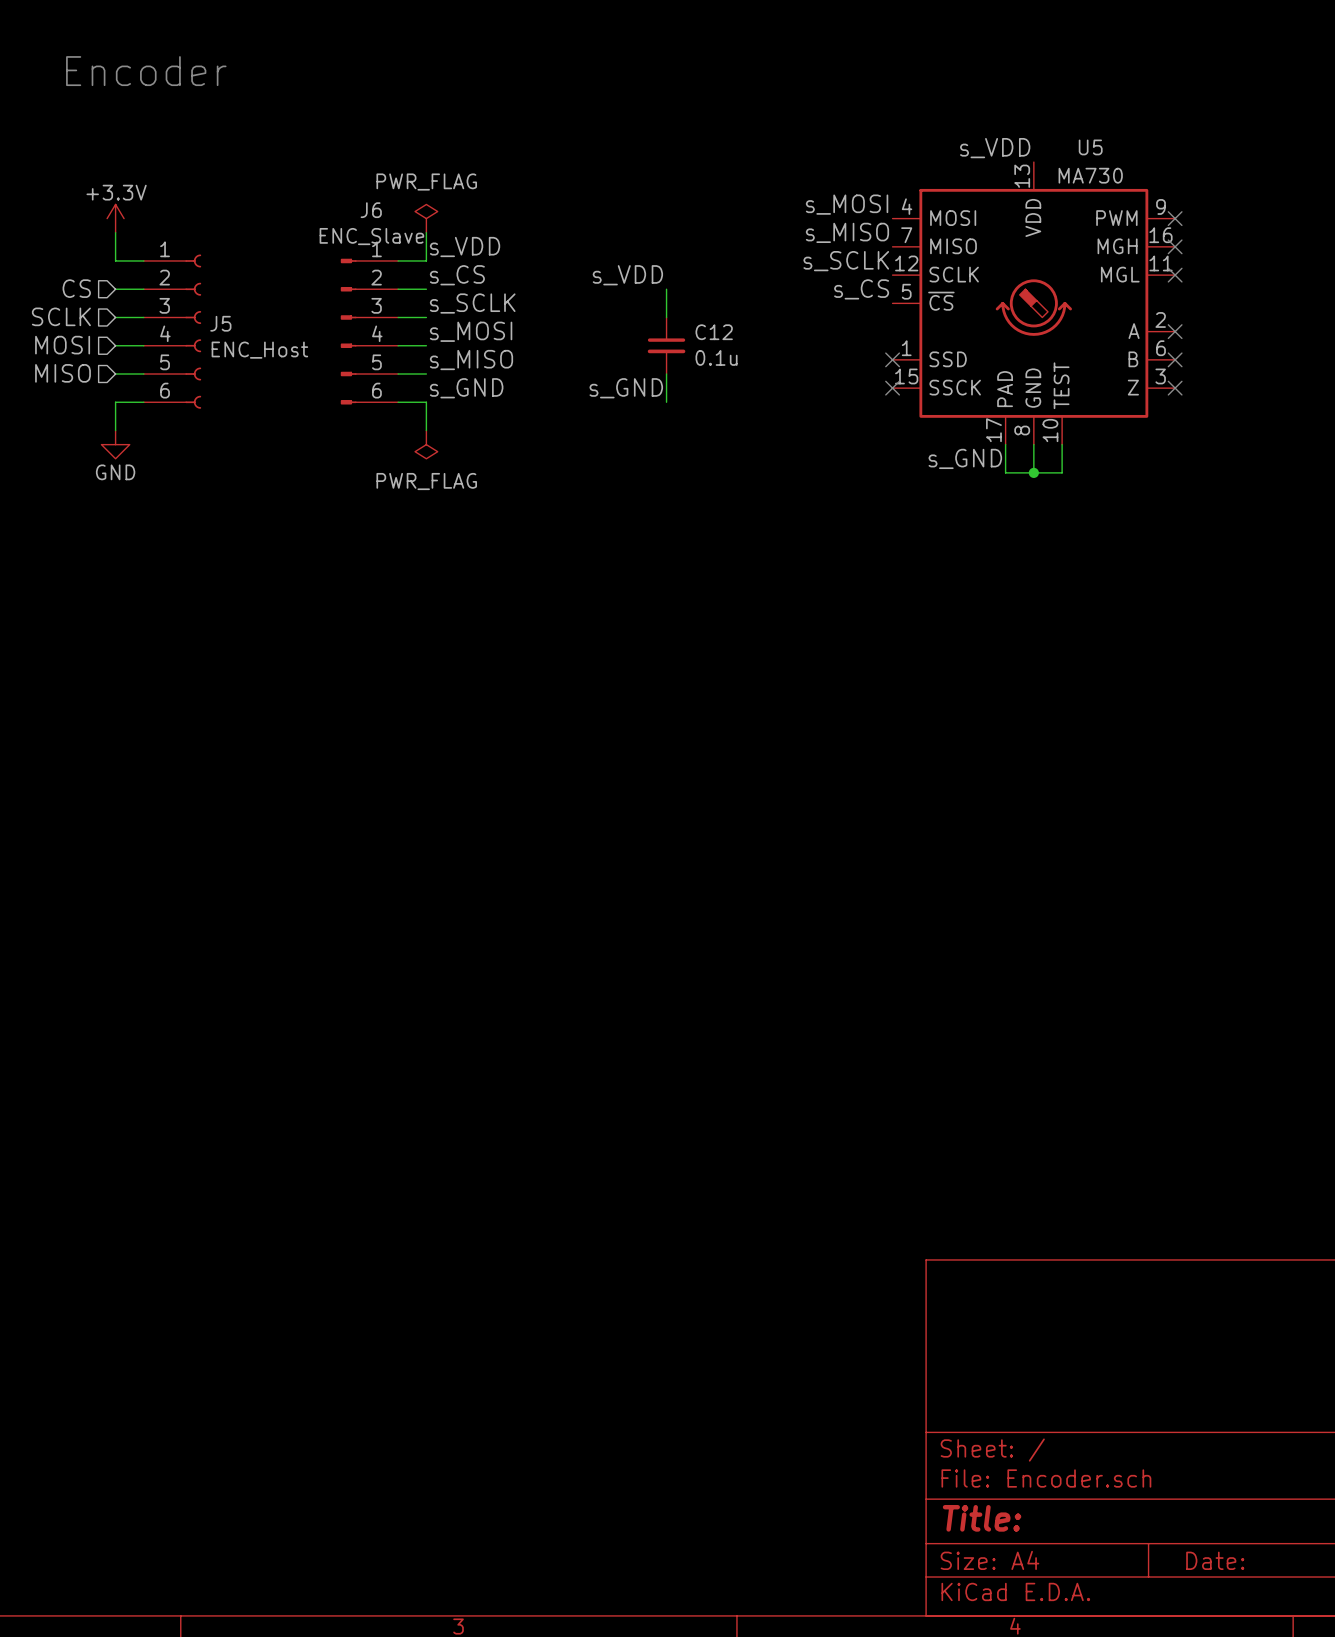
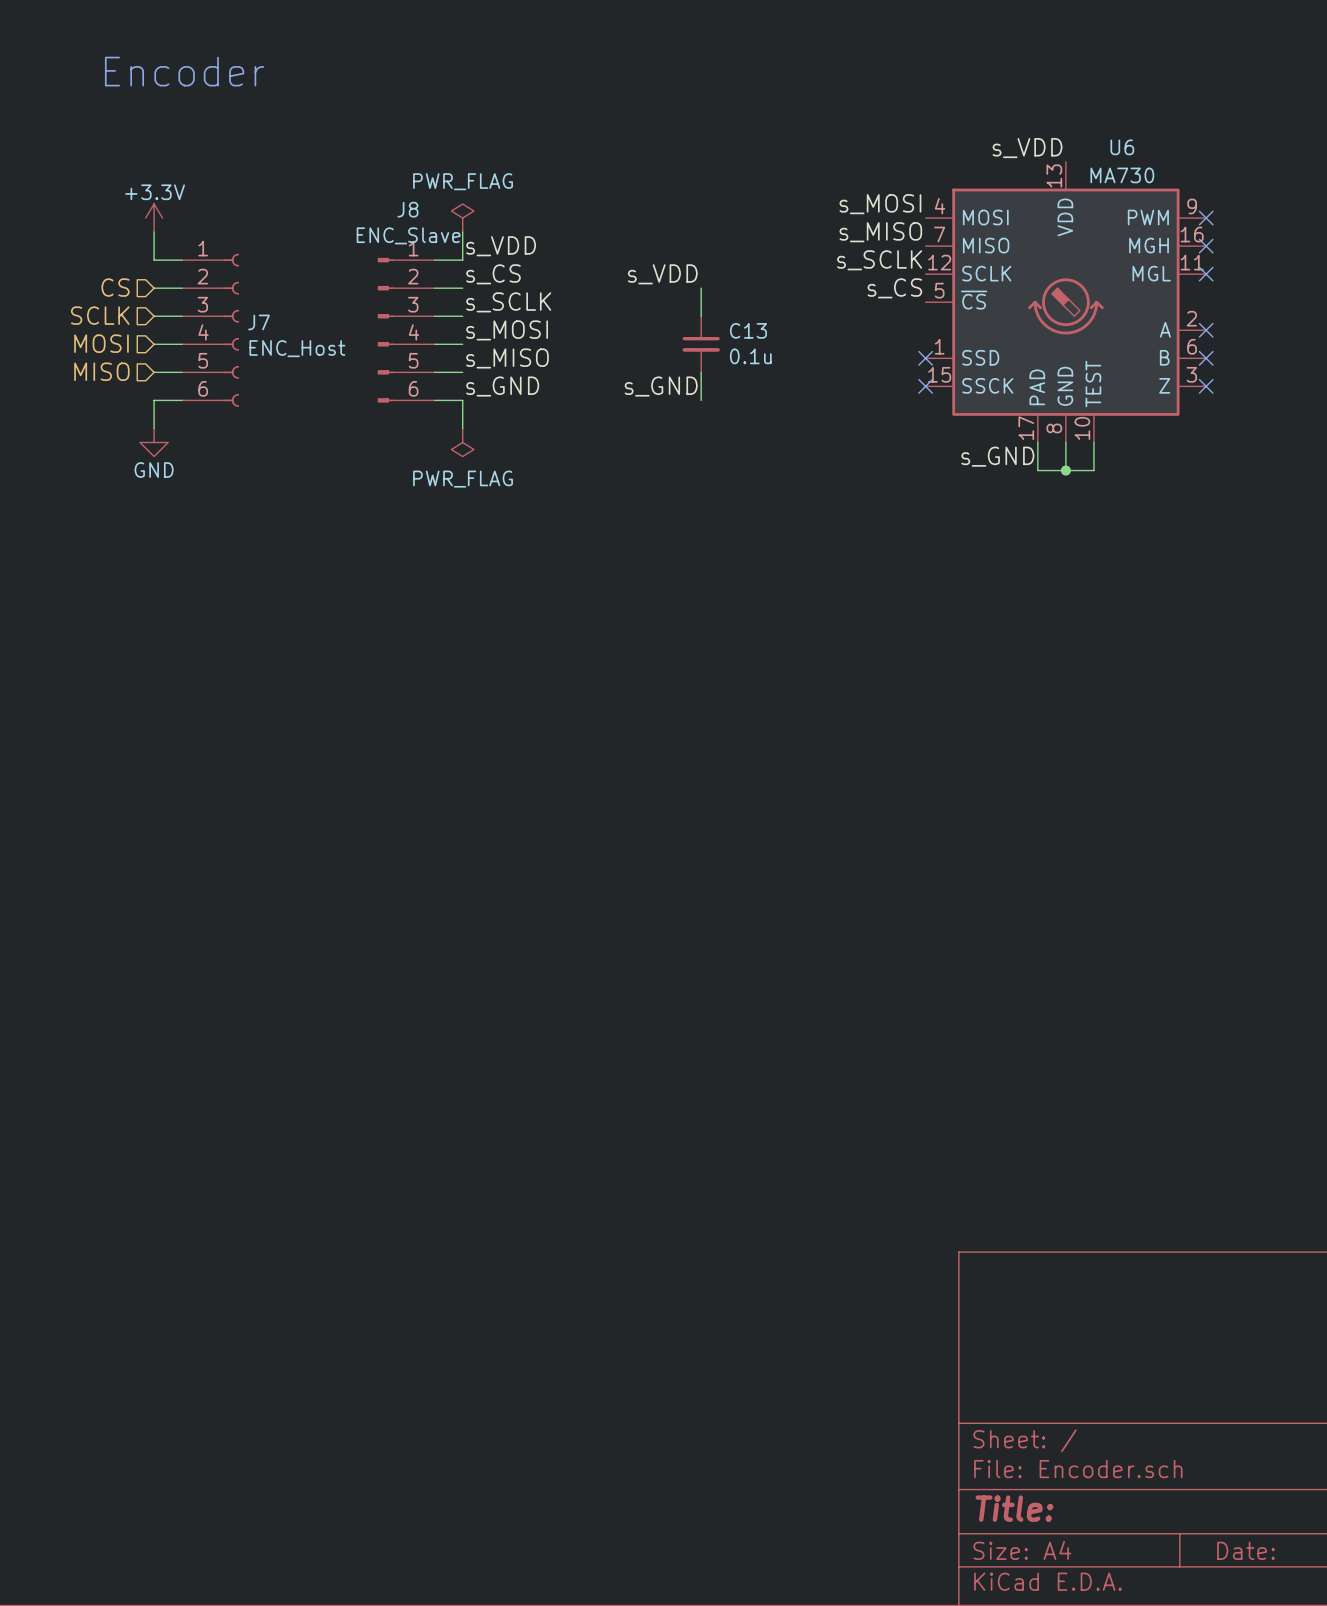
U5 name: U5 (1090, 147) -> U6 (1122, 147)
J6 name: J6 (371, 210) -> J8 (407, 209)
J5 name: J5 (220, 323) -> J7 (258, 322)
C12 name: C12 (714, 332) -> C13 (748, 330)

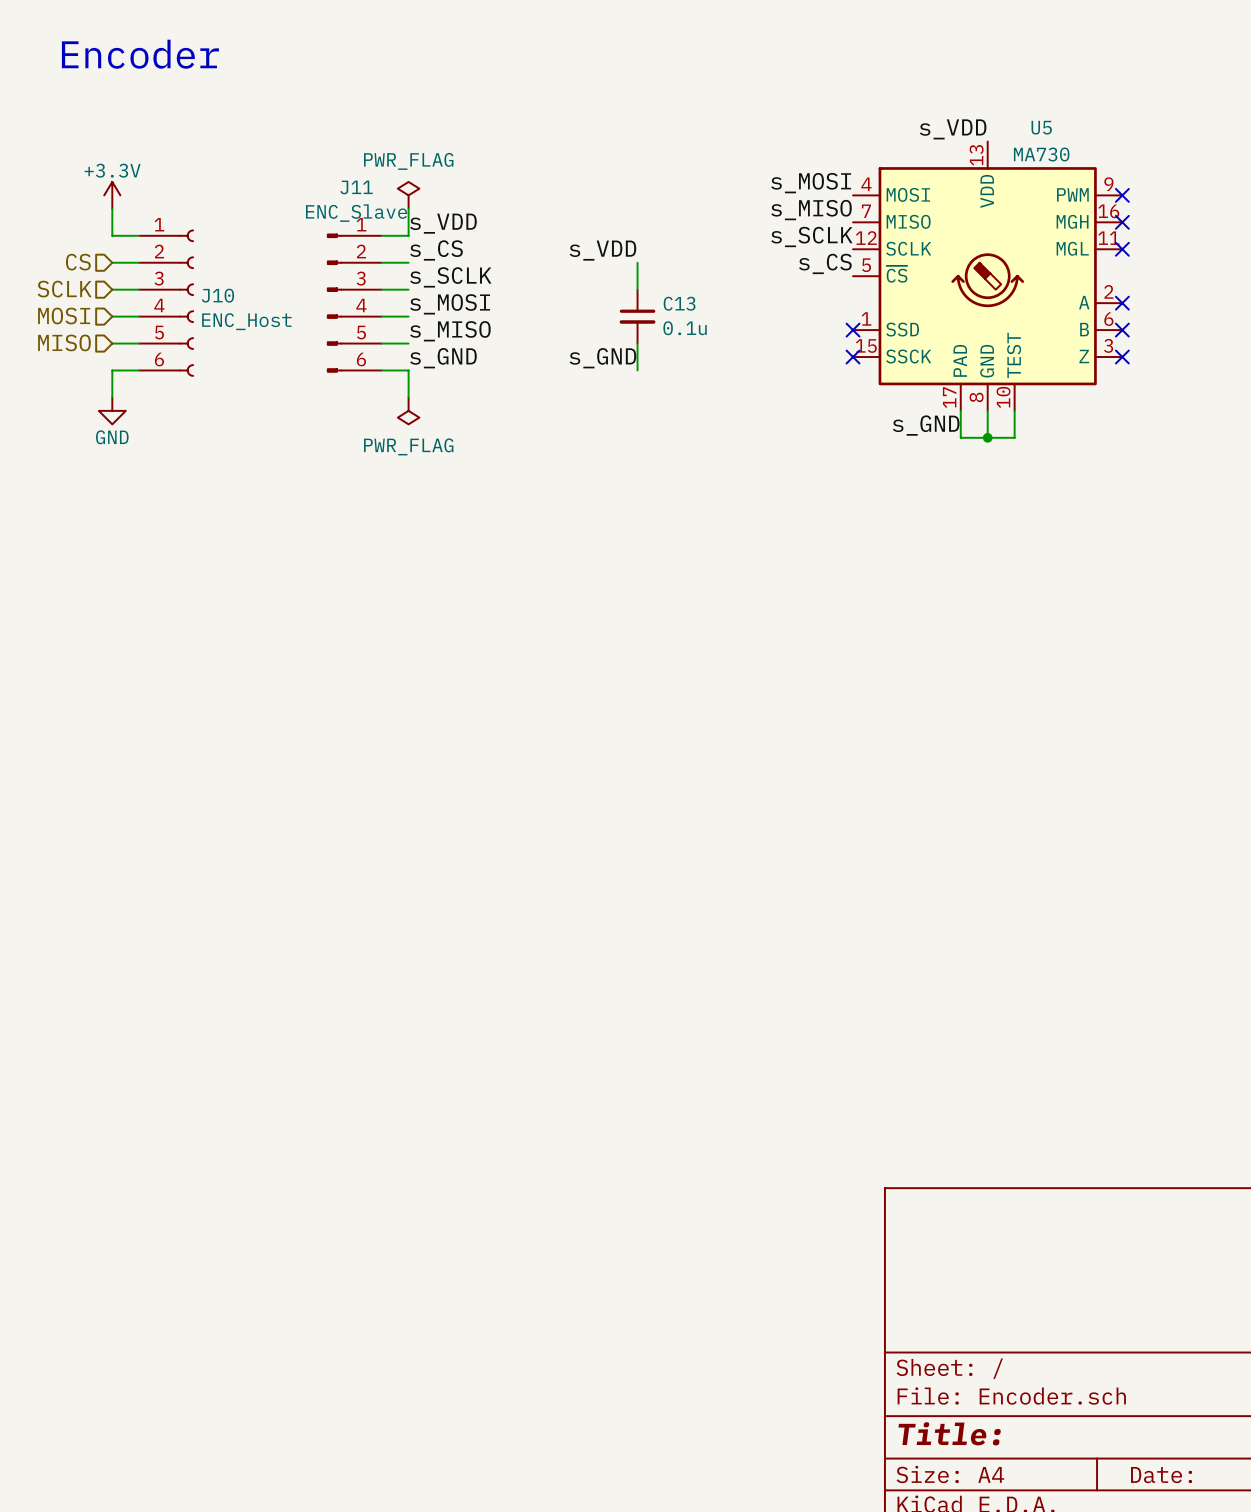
U6 name: U6 (1122, 147) -> U5 (1041, 127)
J8 name: J8 (407, 209) -> J11 (356, 187)
J7 name: J7 (258, 322) -> J10 (217, 295)

